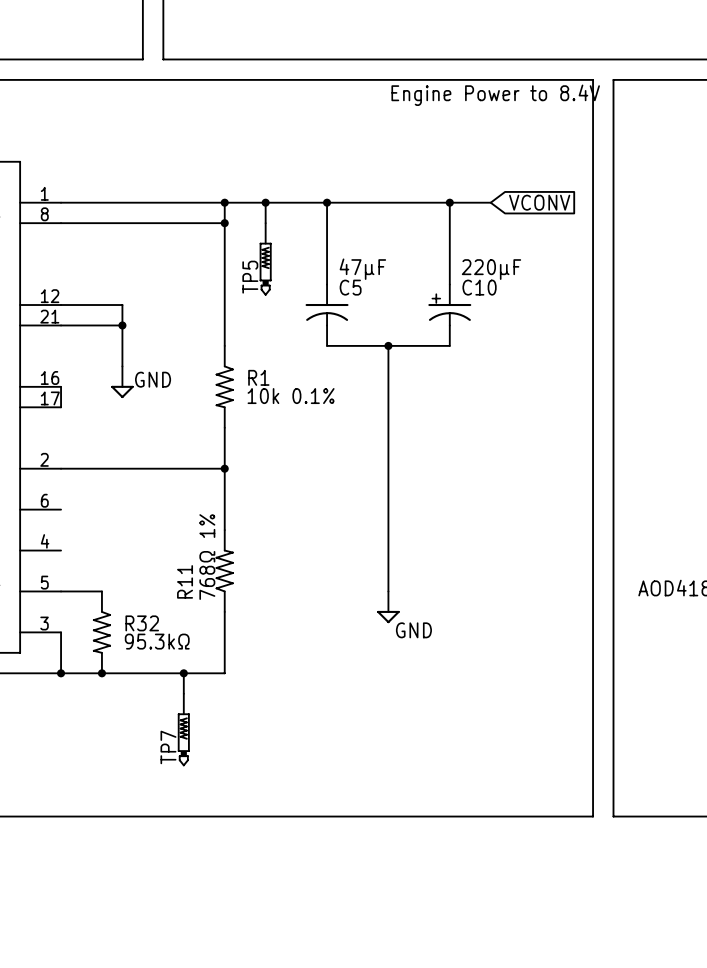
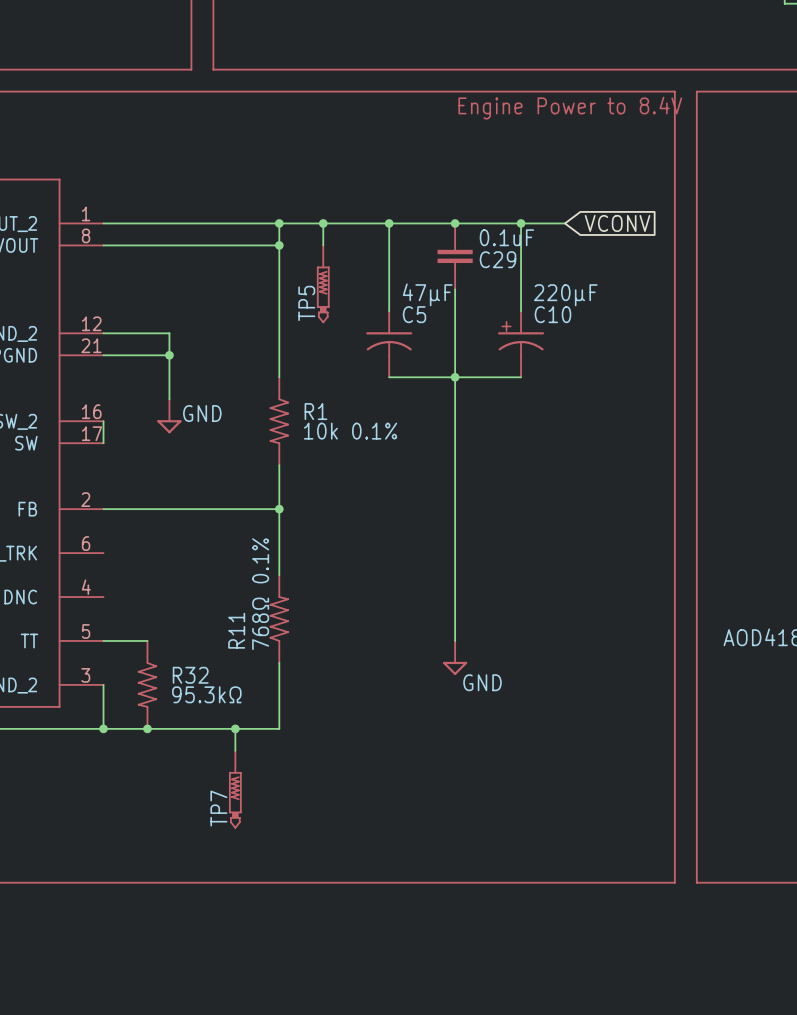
junction: none -> (455, 223)
C29: none -> 0.1uF (455, 256)
wire: none -> (455, 289) (455, 377)
R11 value: 768Ω 1% (207, 557) -> 768Ω 0.1% (260, 594)

